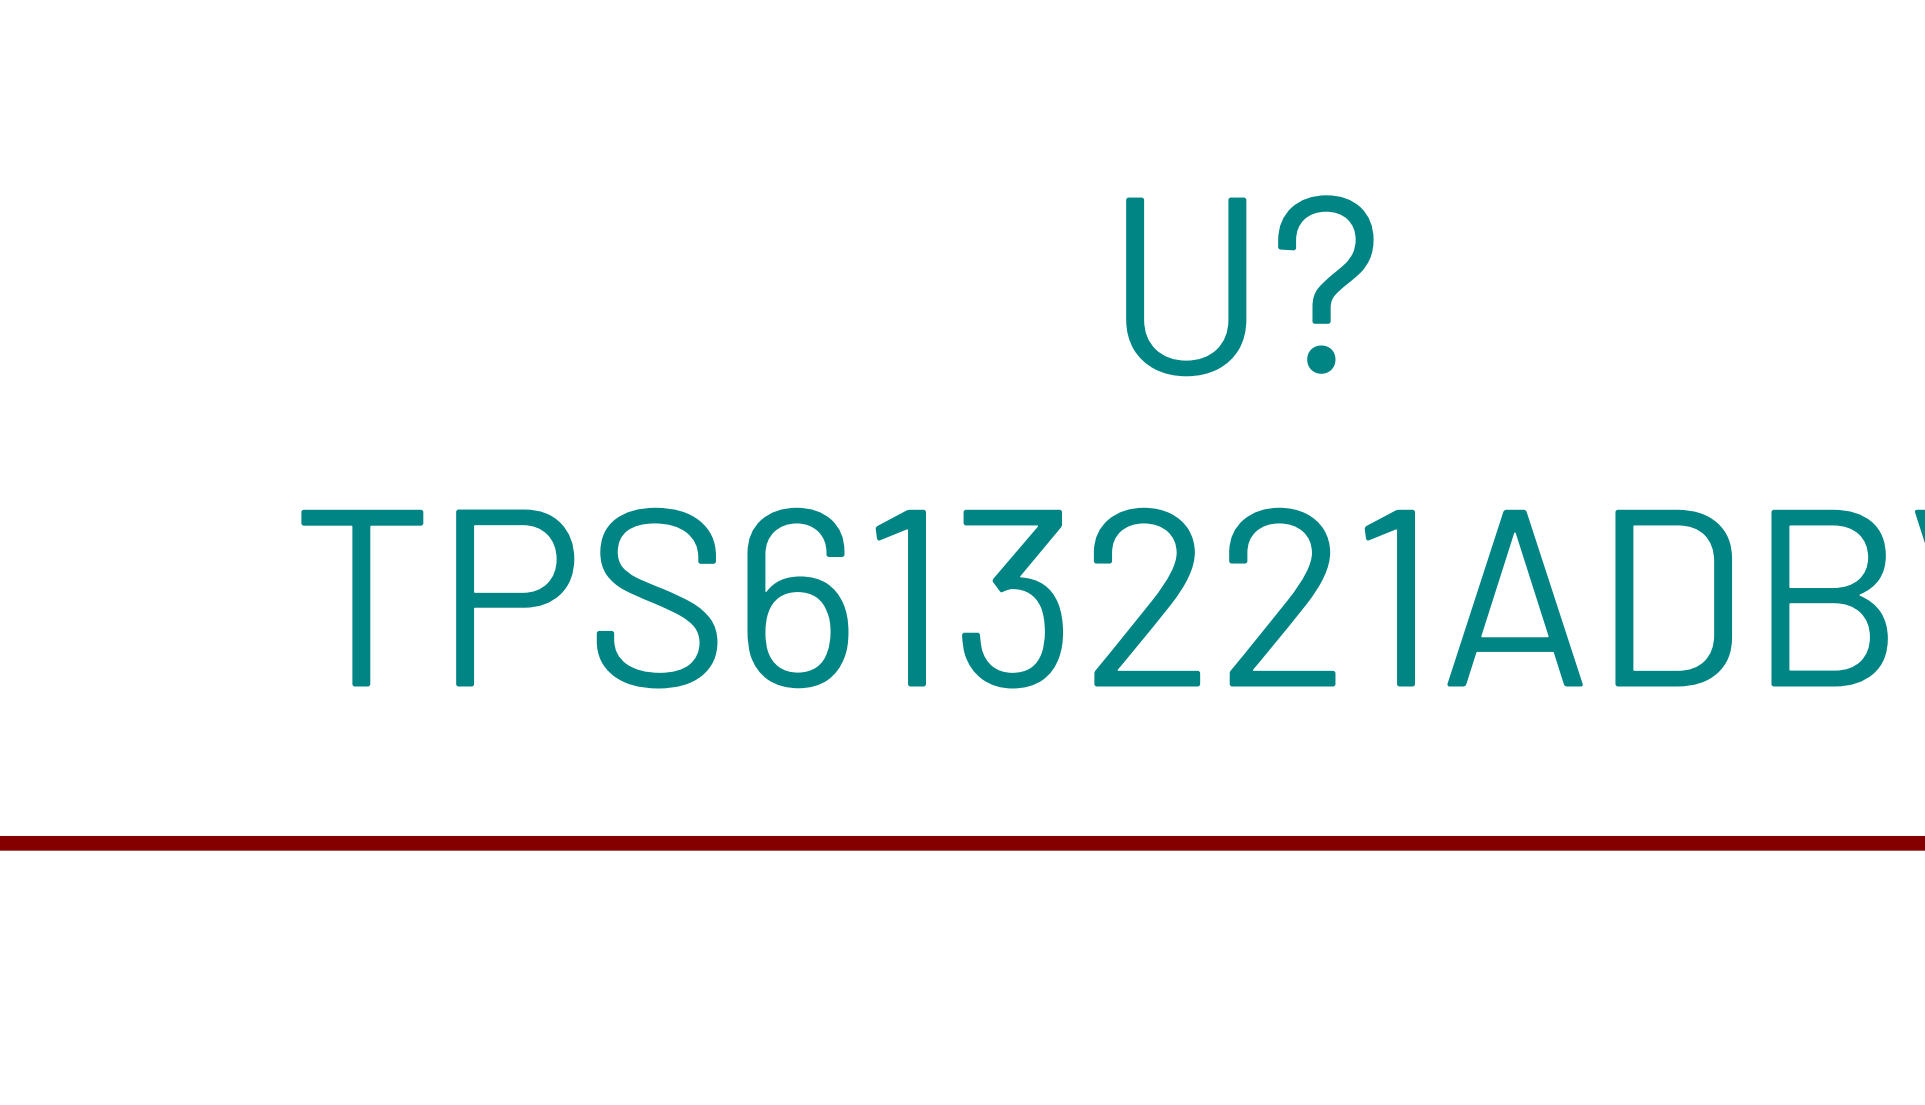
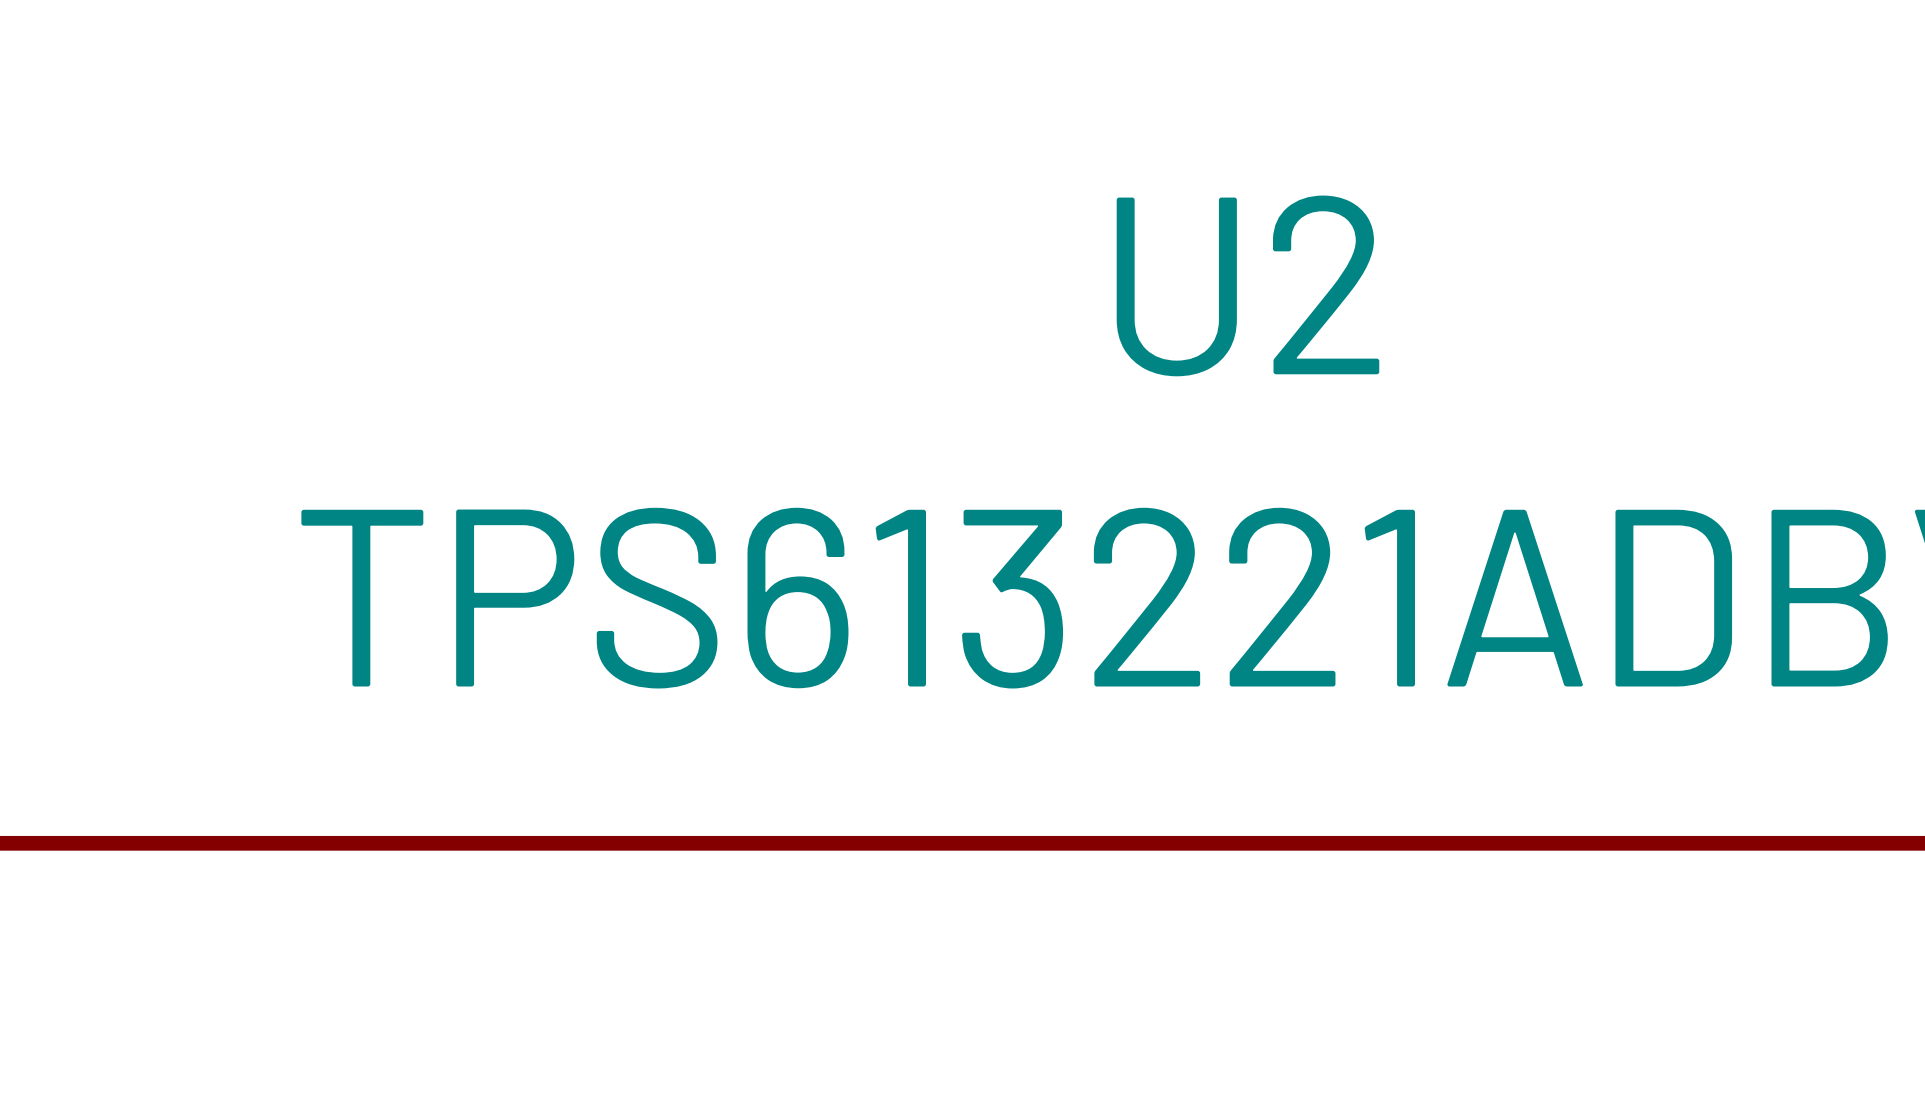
U? name: U? (1249, 285) -> U2 (1247, 285)

